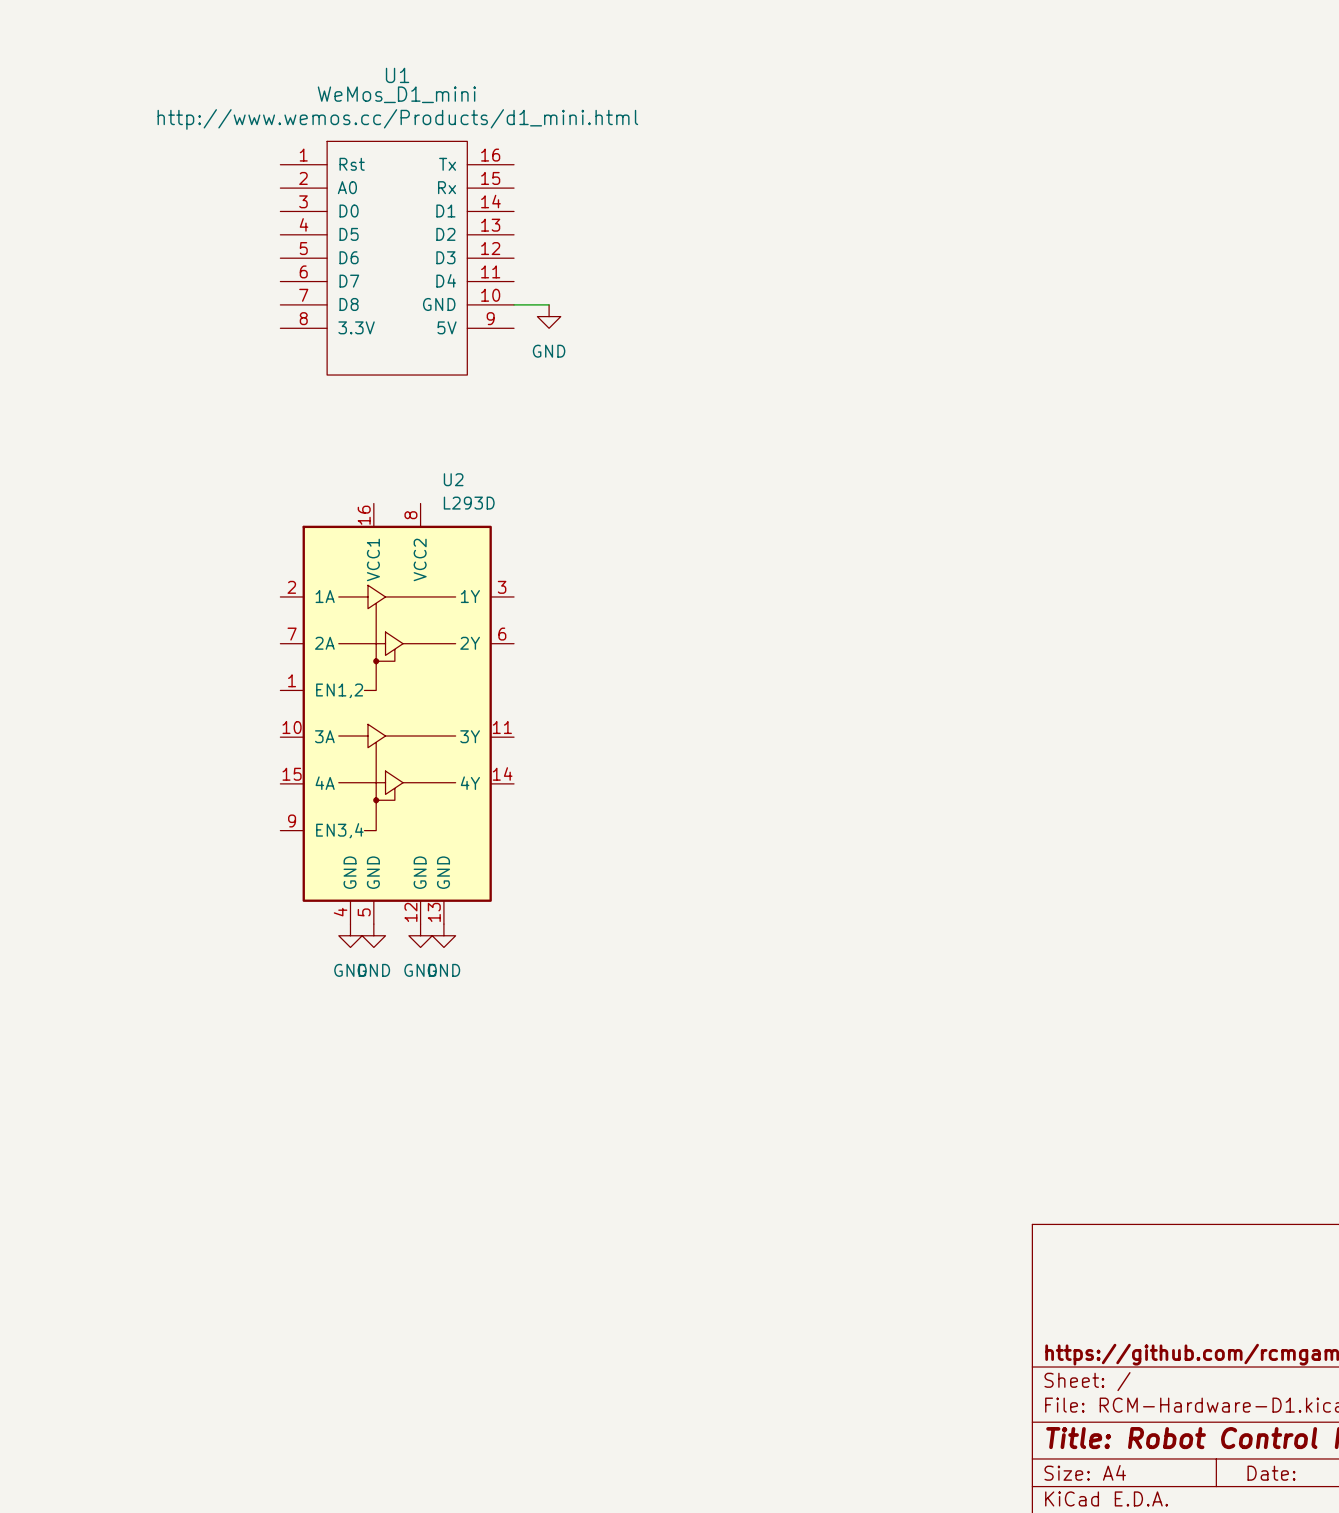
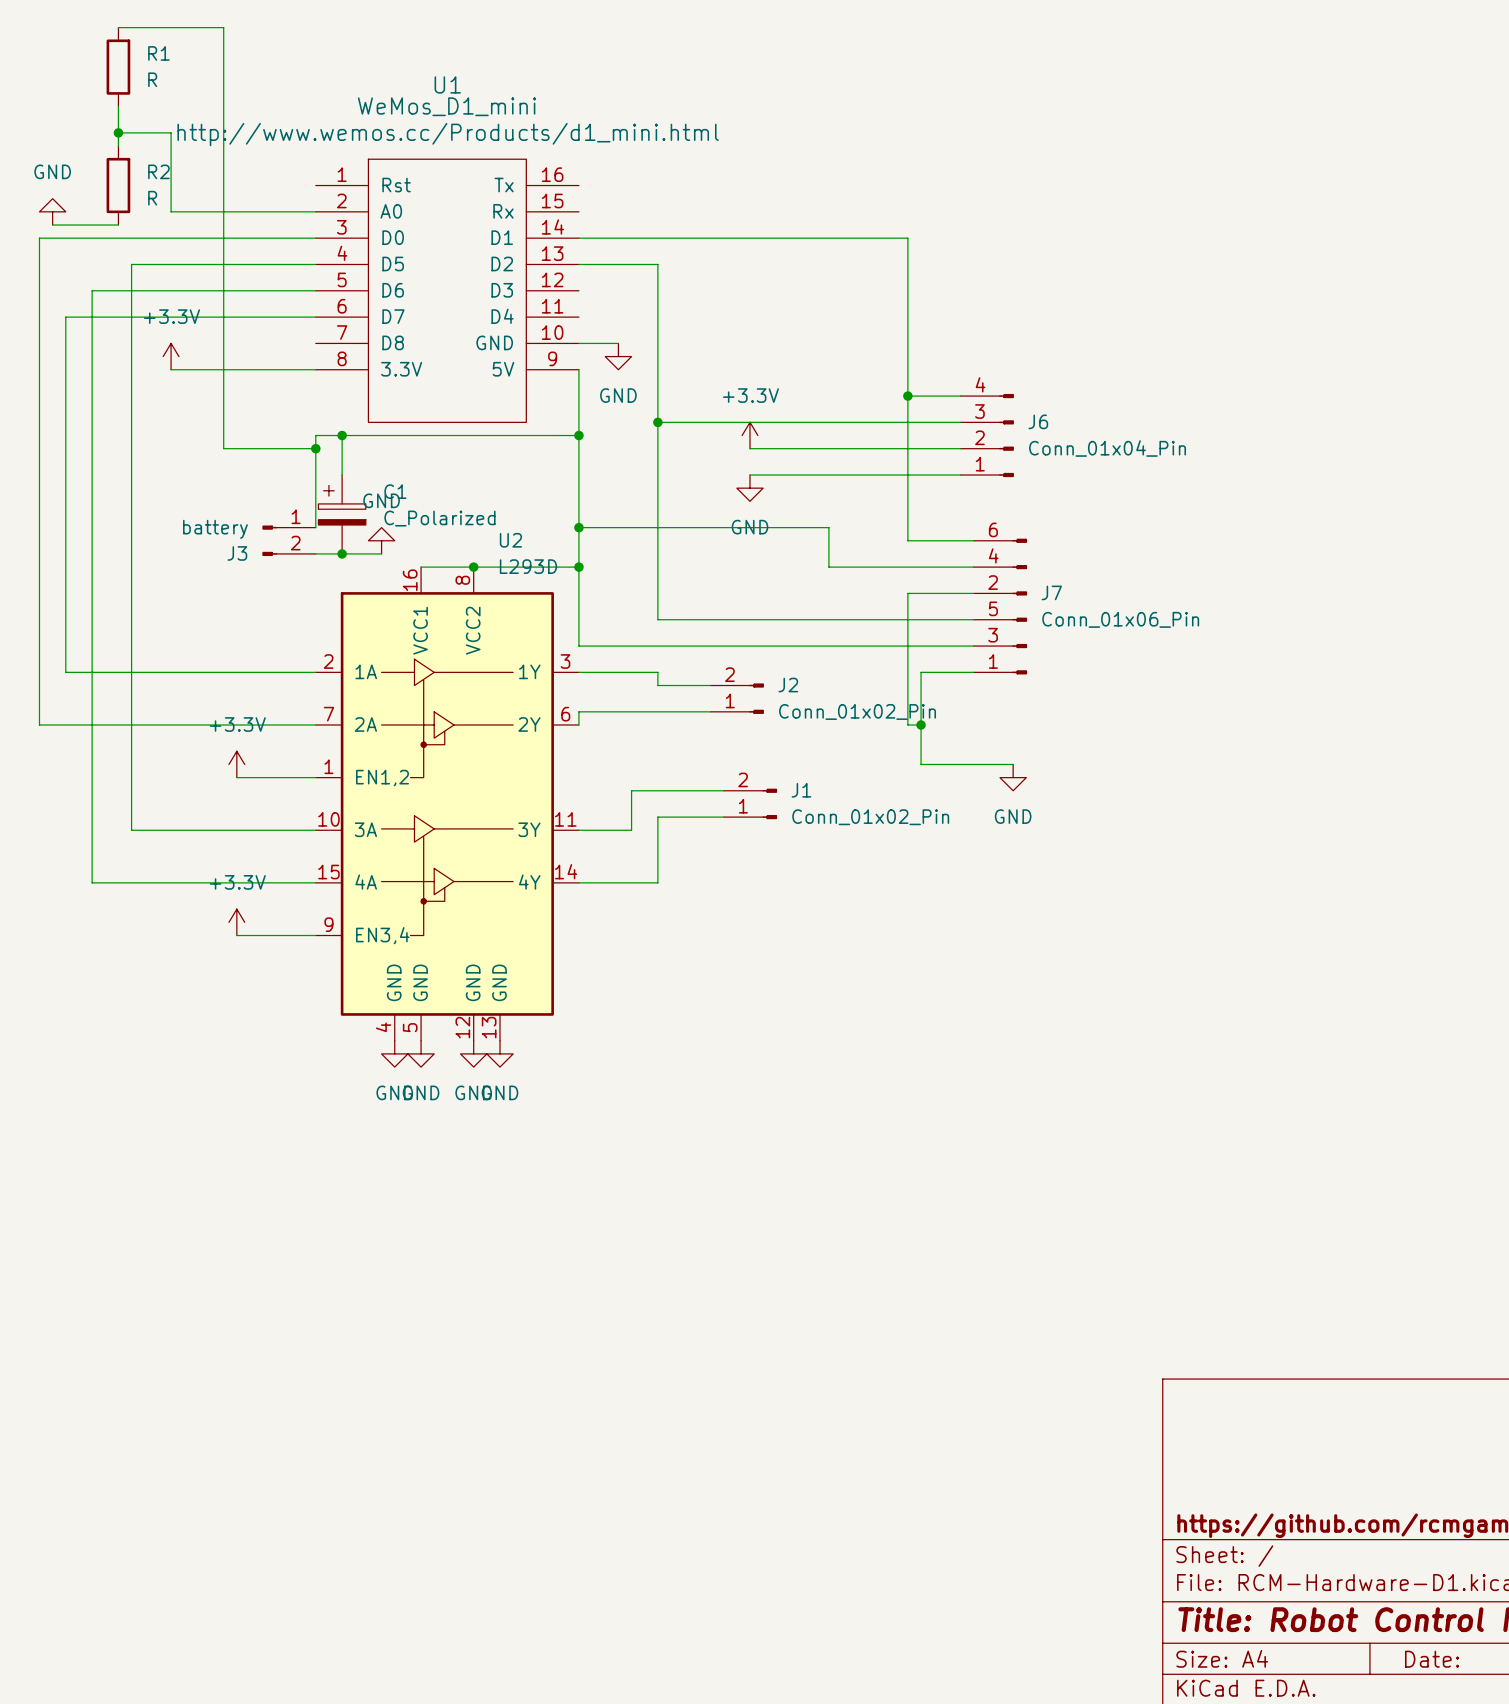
wire: none -> (118, 27) (223, 27) (223, 448) (315, 448)
R1: none -> R (118, 67)
wire: none -> (118, 106) (118, 146)
wire: none -> (118, 132) (171, 132) (171, 211) (315, 211)
junction: none -> (118, 132)
R2: none -> R (118, 185)
power symbol: none -> GND (52, 211)
wire: none -> (52, 225) (118, 225)
wire: none -> (315, 238) (39, 238) (39, 724) (315, 724)
wire: none -> (578, 238) (907, 238) (907, 540) (973, 540)
wire: none -> (315, 264) (131, 264) (131, 830) (315, 830)
wire: none -> (578, 264) (657, 264) (657, 619) (973, 619)
wire: none -> (315, 290) (92, 290) (92, 882) (315, 882)
wire: none -> (315, 317) (65, 317) (65, 672) (315, 672)
power symbol: none -> +3.3V (171, 356)
wire: none -> (171, 369) (315, 369)
wire: none -> (578, 369) (578, 646) (973, 646)
wire: none -> (907, 396) (960, 396)
junction: none -> (907, 396)
wire: none -> (657, 422) (960, 422)
junction: none -> (657, 422)
wire: none -> (342, 435) (342, 475)
junction: none -> (342, 435)
wire: none -> (578, 435) (315, 435) (315, 527)
junction: none -> (578, 435)
power symbol: none -> +3.3V (749, 435)
J6: none -> Conn_01x04_Pin (987, 435)
junction: none -> (315, 448)
wire: none -> (749, 448) (960, 448)
wire: none -> (749, 475) (960, 475)
power symbol: none -> GND (749, 488)
C1: none -> C_Polarized (342, 514)
wire: none -> (578, 527) (828, 527) (828, 567) (973, 567)
junction: none -> (578, 527)
J3: none -> battery (289, 540)
power symbol: none -> GND (381, 540)
wire: none -> (315, 553) (381, 553)
junction: none -> (342, 553)
wire: none -> (421, 567) (578, 567)
junction: none -> (473, 567)
junction: none -> (578, 567)
wire: none -> (973, 593) (907, 593) (907, 724) (921, 724)
J7: none -> Conn_01x06_Pin (1000, 606)
wire: none -> (578, 672) (657, 672) (657, 685) (710, 685)
wire: none -> (973, 672) (921, 672) (921, 764) (1013, 764)
J2: none -> Conn_01x02_Pin (737, 698)
wire: none -> (710, 711) (578, 711) (578, 724)
junction: none -> (921, 724)
power symbol: none -> +3.3V (236, 764)
wire: none -> (236, 777) (315, 777)
power symbol: none -> GND (1013, 777)
wire: none -> (723, 790) (631, 790) (631, 830) (578, 830)
J1: none -> Conn_01x02_Pin (750, 803)
wire: none -> (723, 817) (657, 817) (657, 882) (578, 882)
power symbol: none -> +3.3V (236, 922)
wire: none -> (236, 935) (315, 935)

